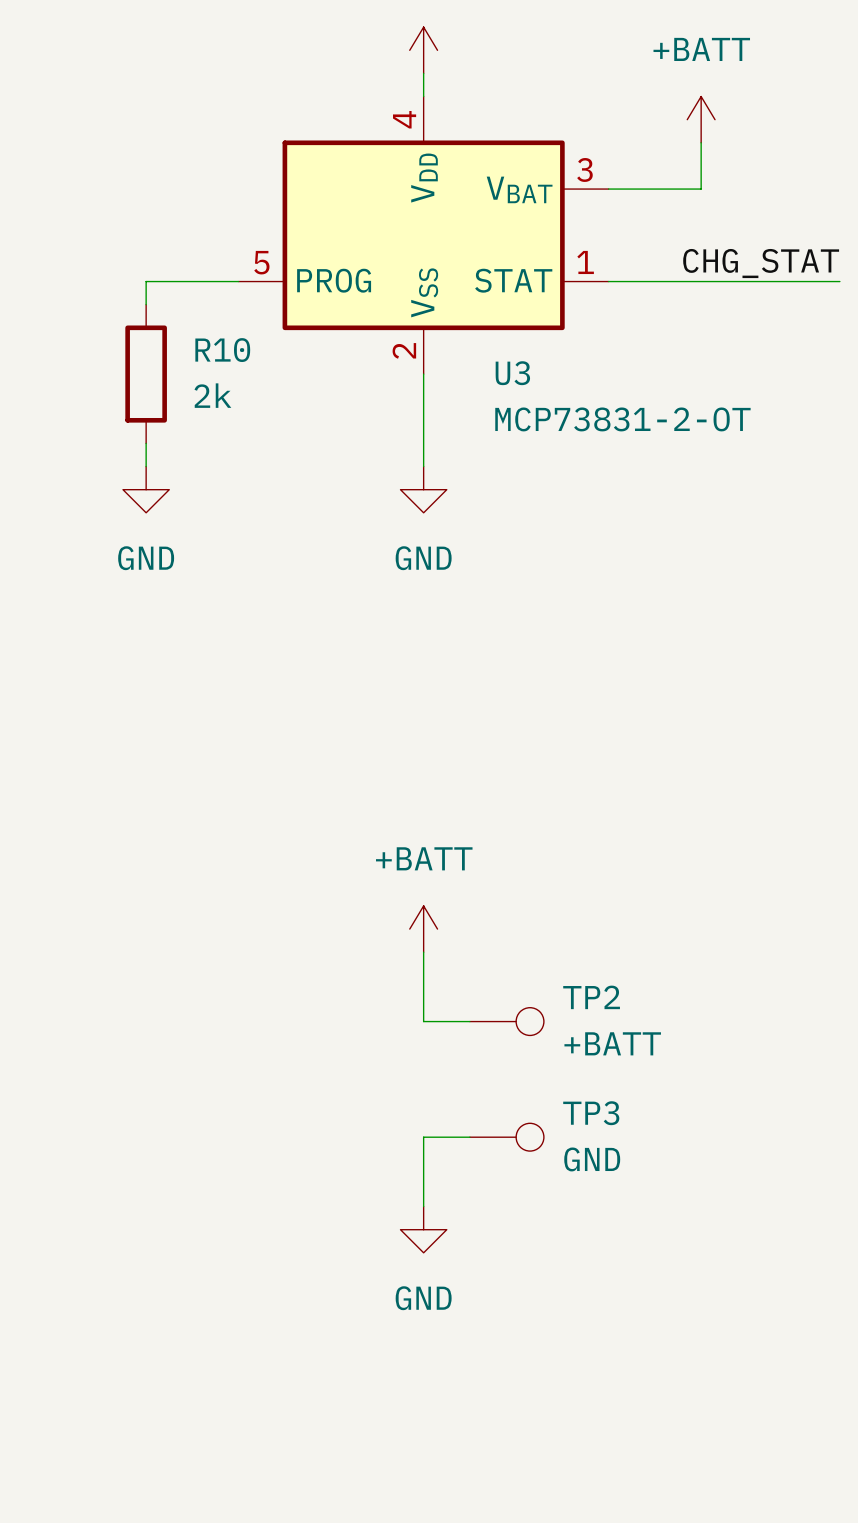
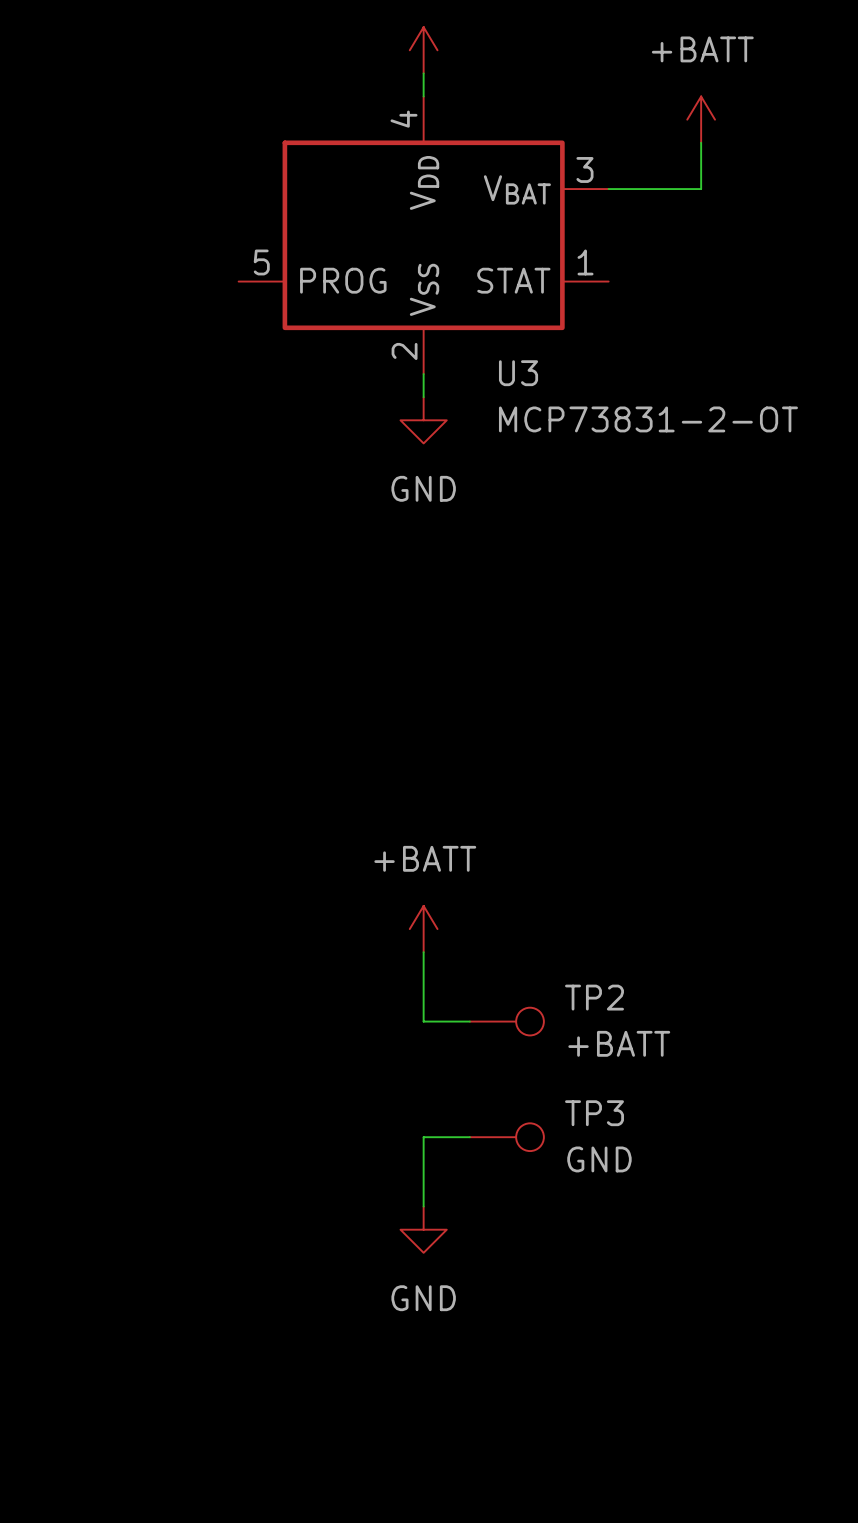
label: CHG_STAT (761, 263) -> none
wire: (238, 281) (146, 281) (146, 304) -> none
wire: (608, 281) (839, 281) -> none
R10: 2k (146, 374) -> none
wire: (423, 397) (423, 466) -> none
wire: (146, 443) (146, 466) -> none
power symbol: GND (146, 489) -> none
power symbol position: GND (423, 489) -> GND (423, 420)

